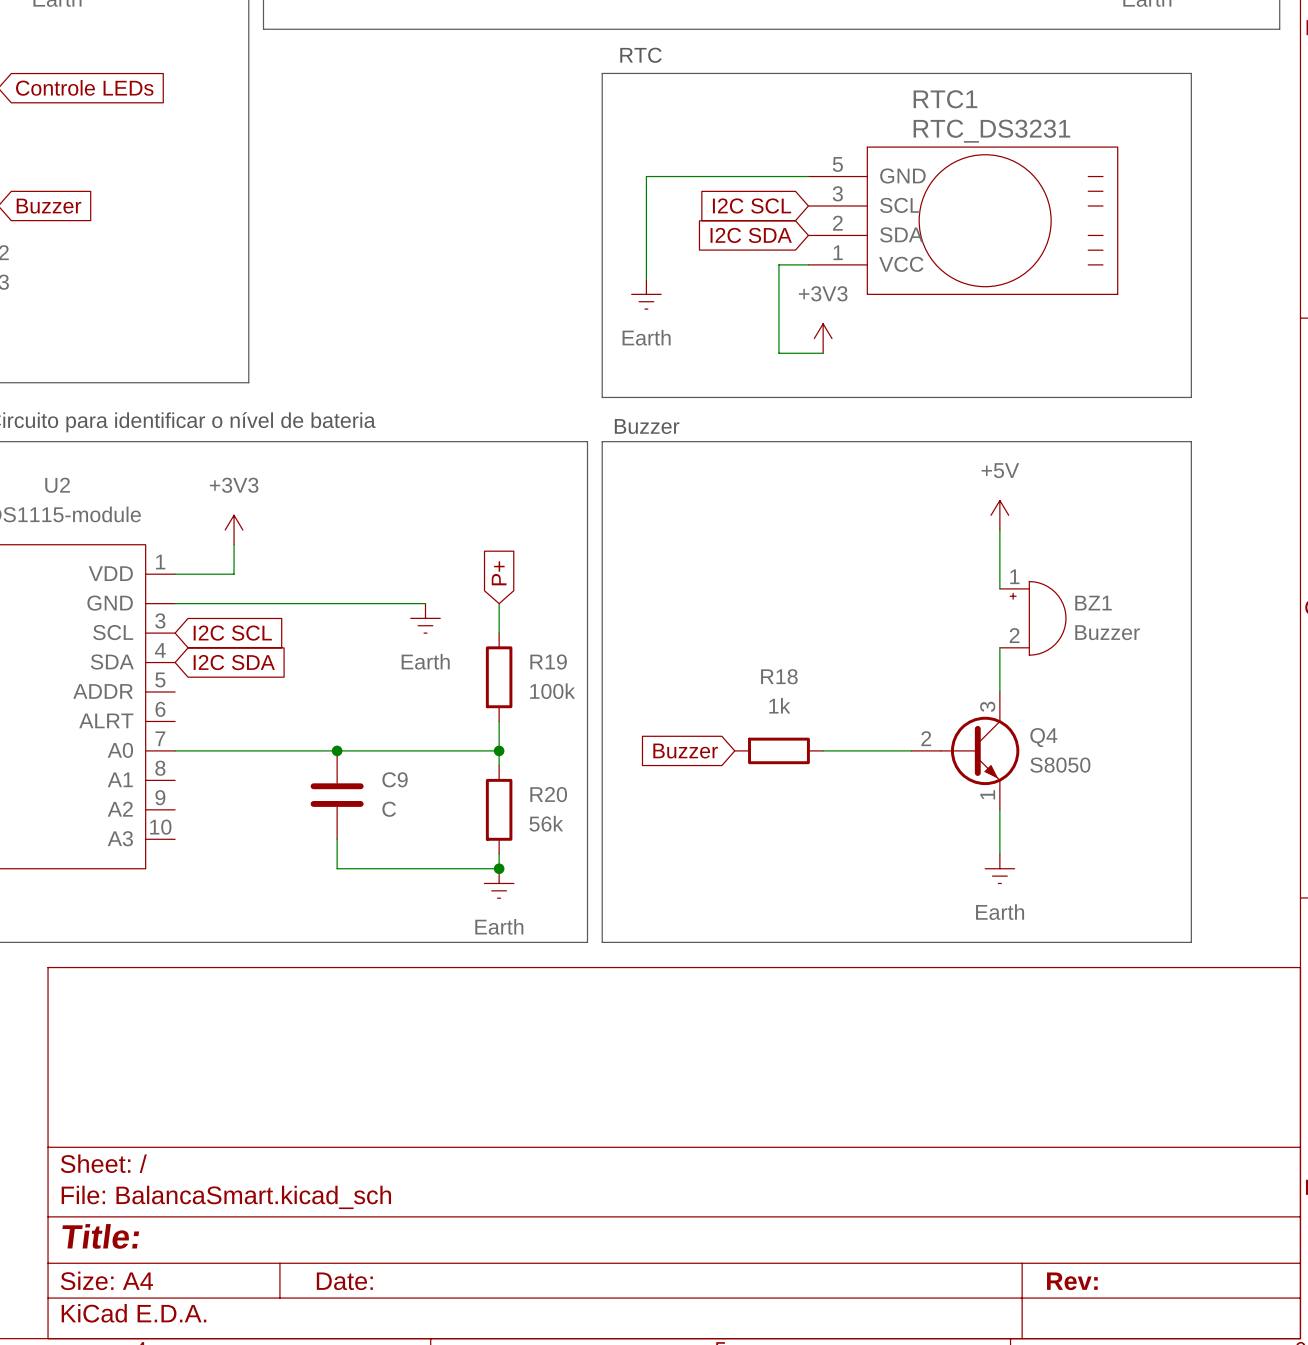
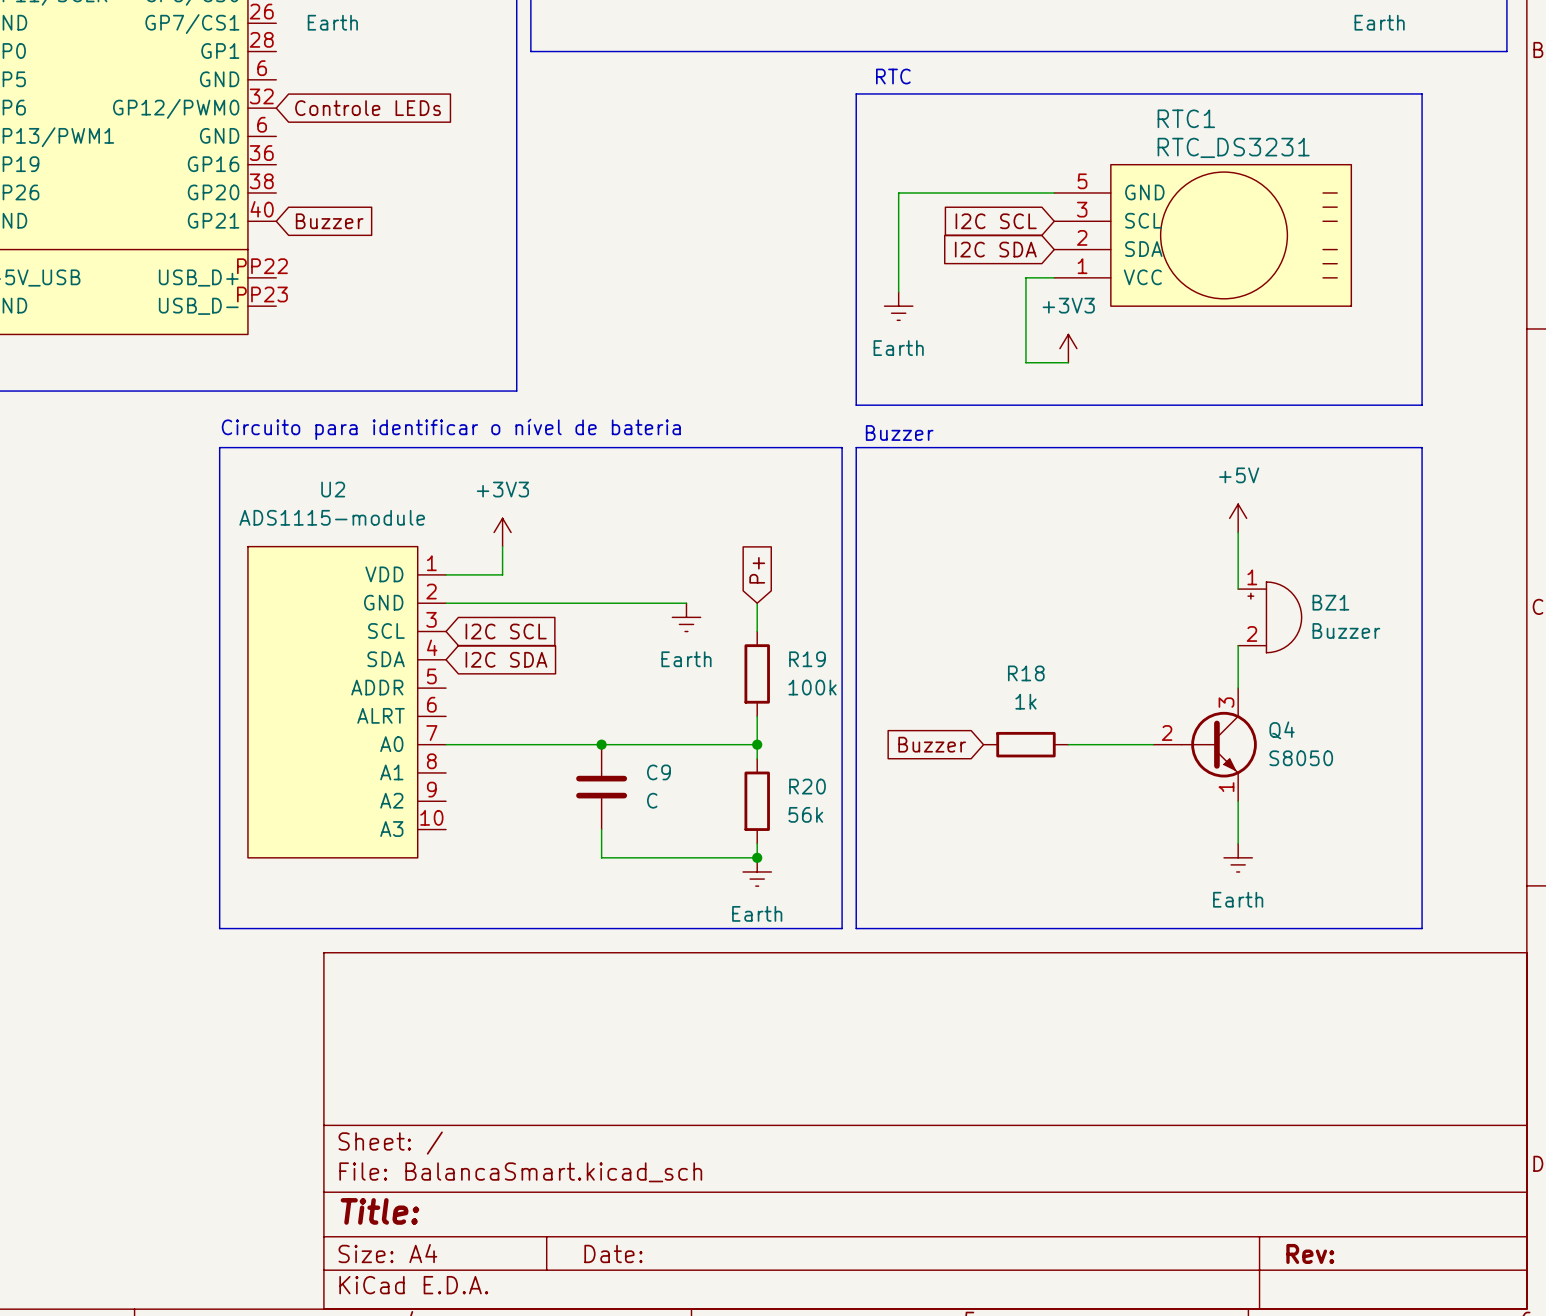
U2 pin number: none -> 2 (431, 591)

